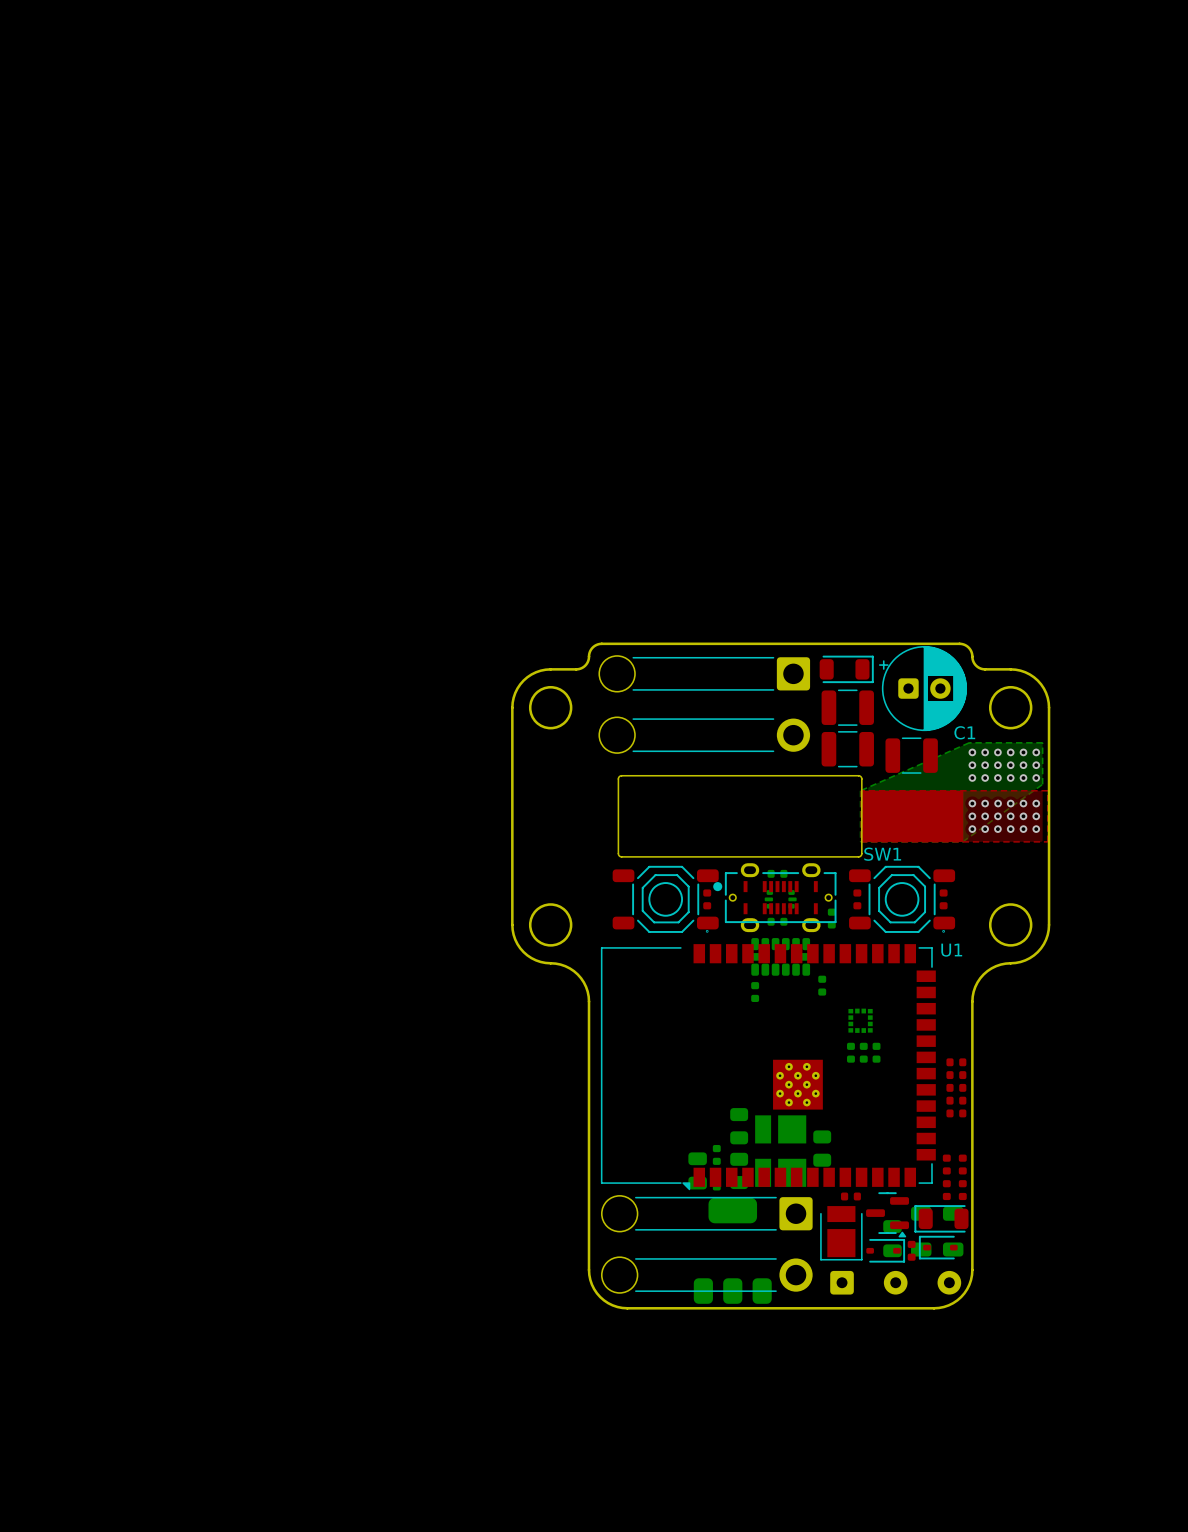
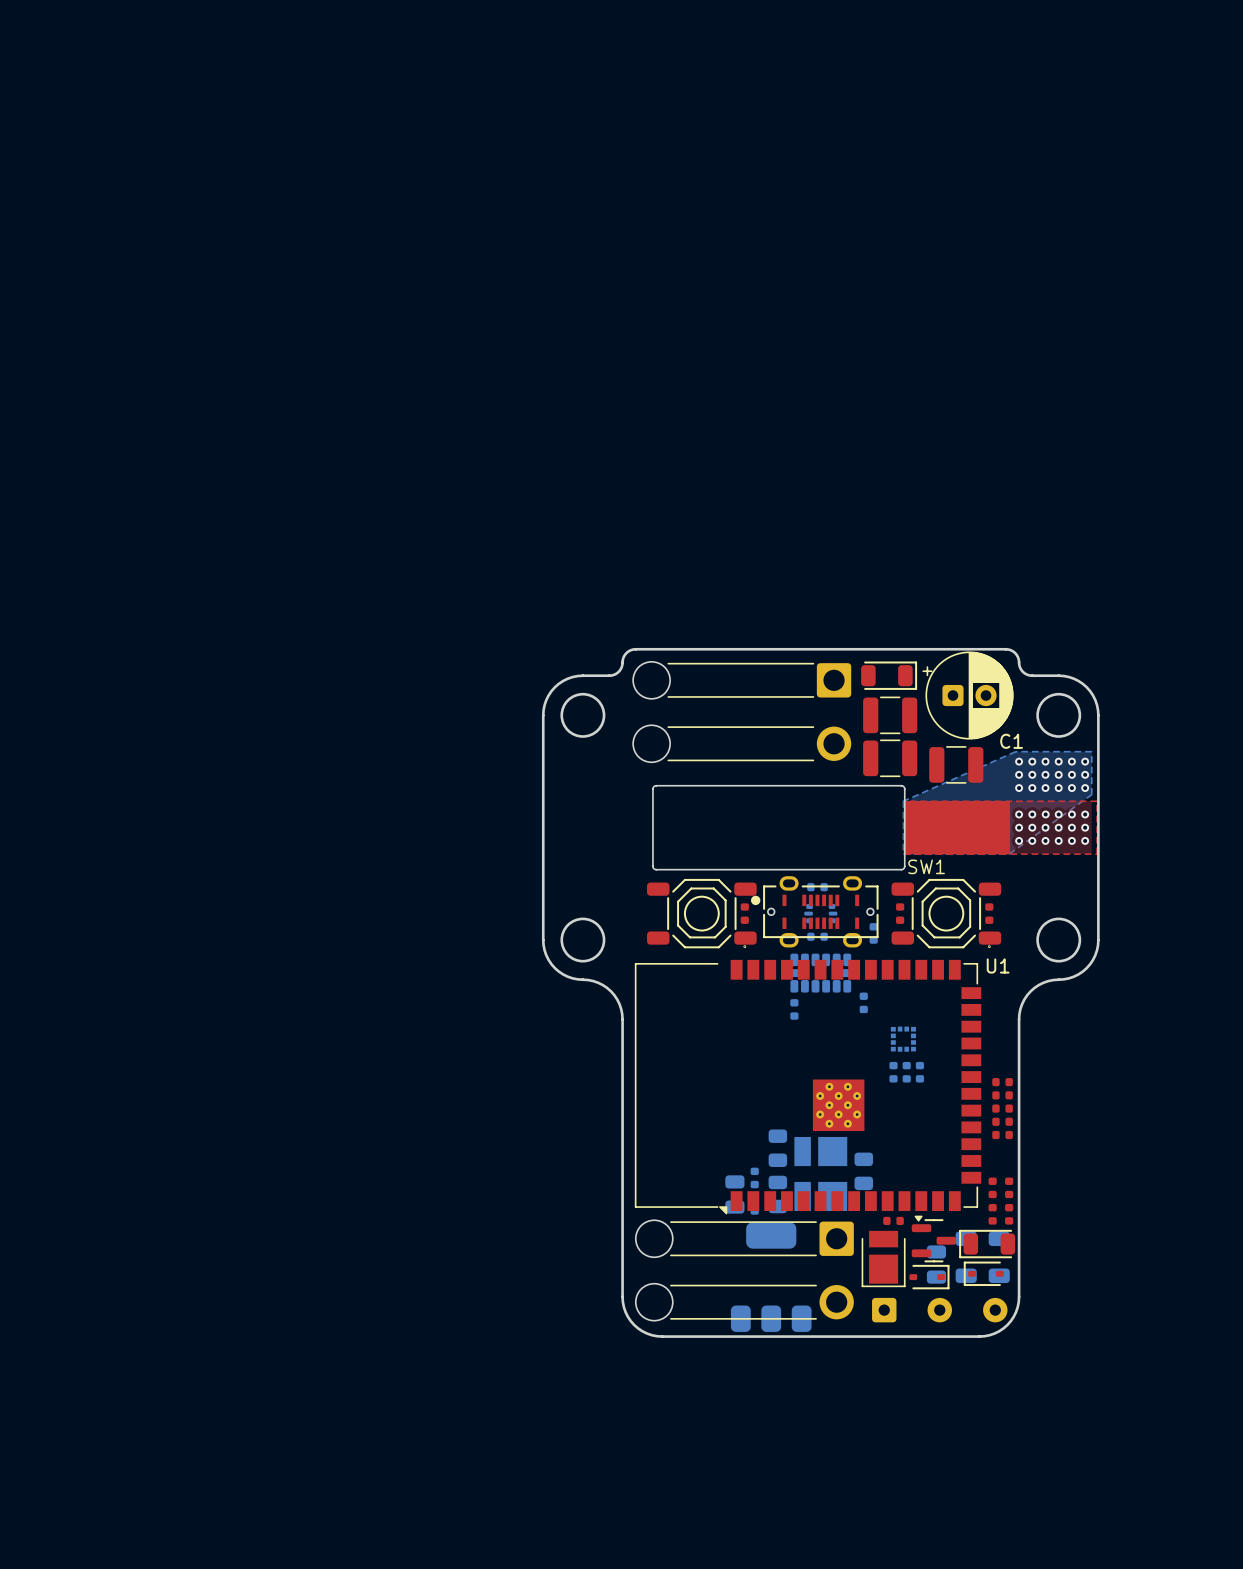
part rotation: 0° (887, 1214) -> 180° (933, 1238)
part: (911, 1250) -> none

